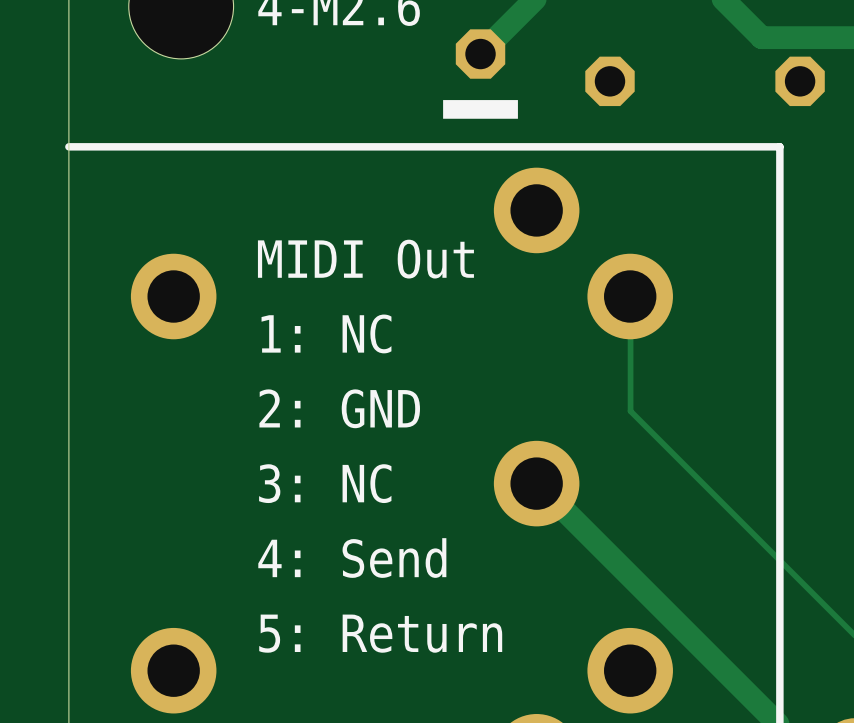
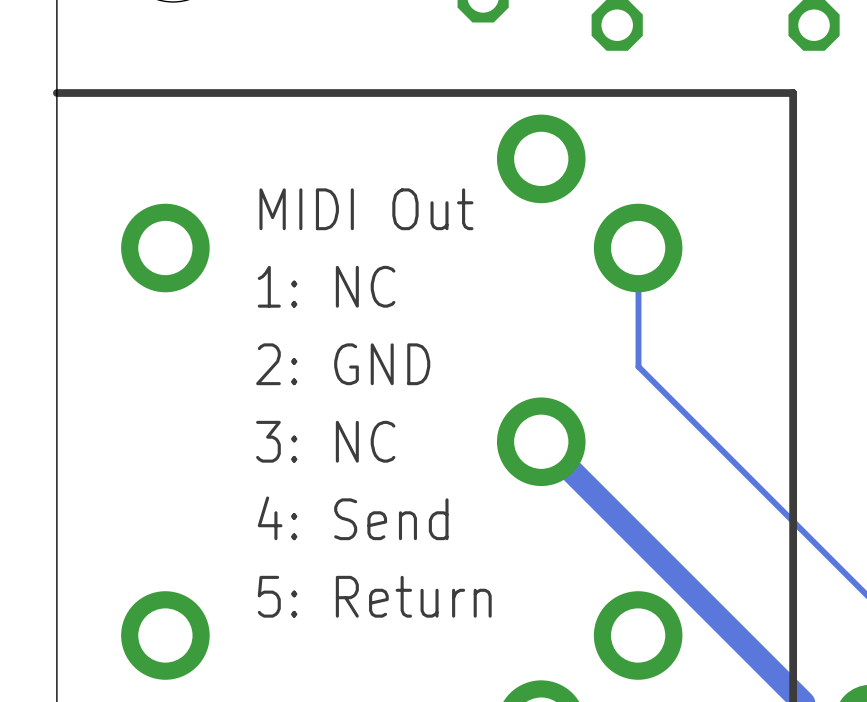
drawing: [443, 100, 518, 119] -> none

